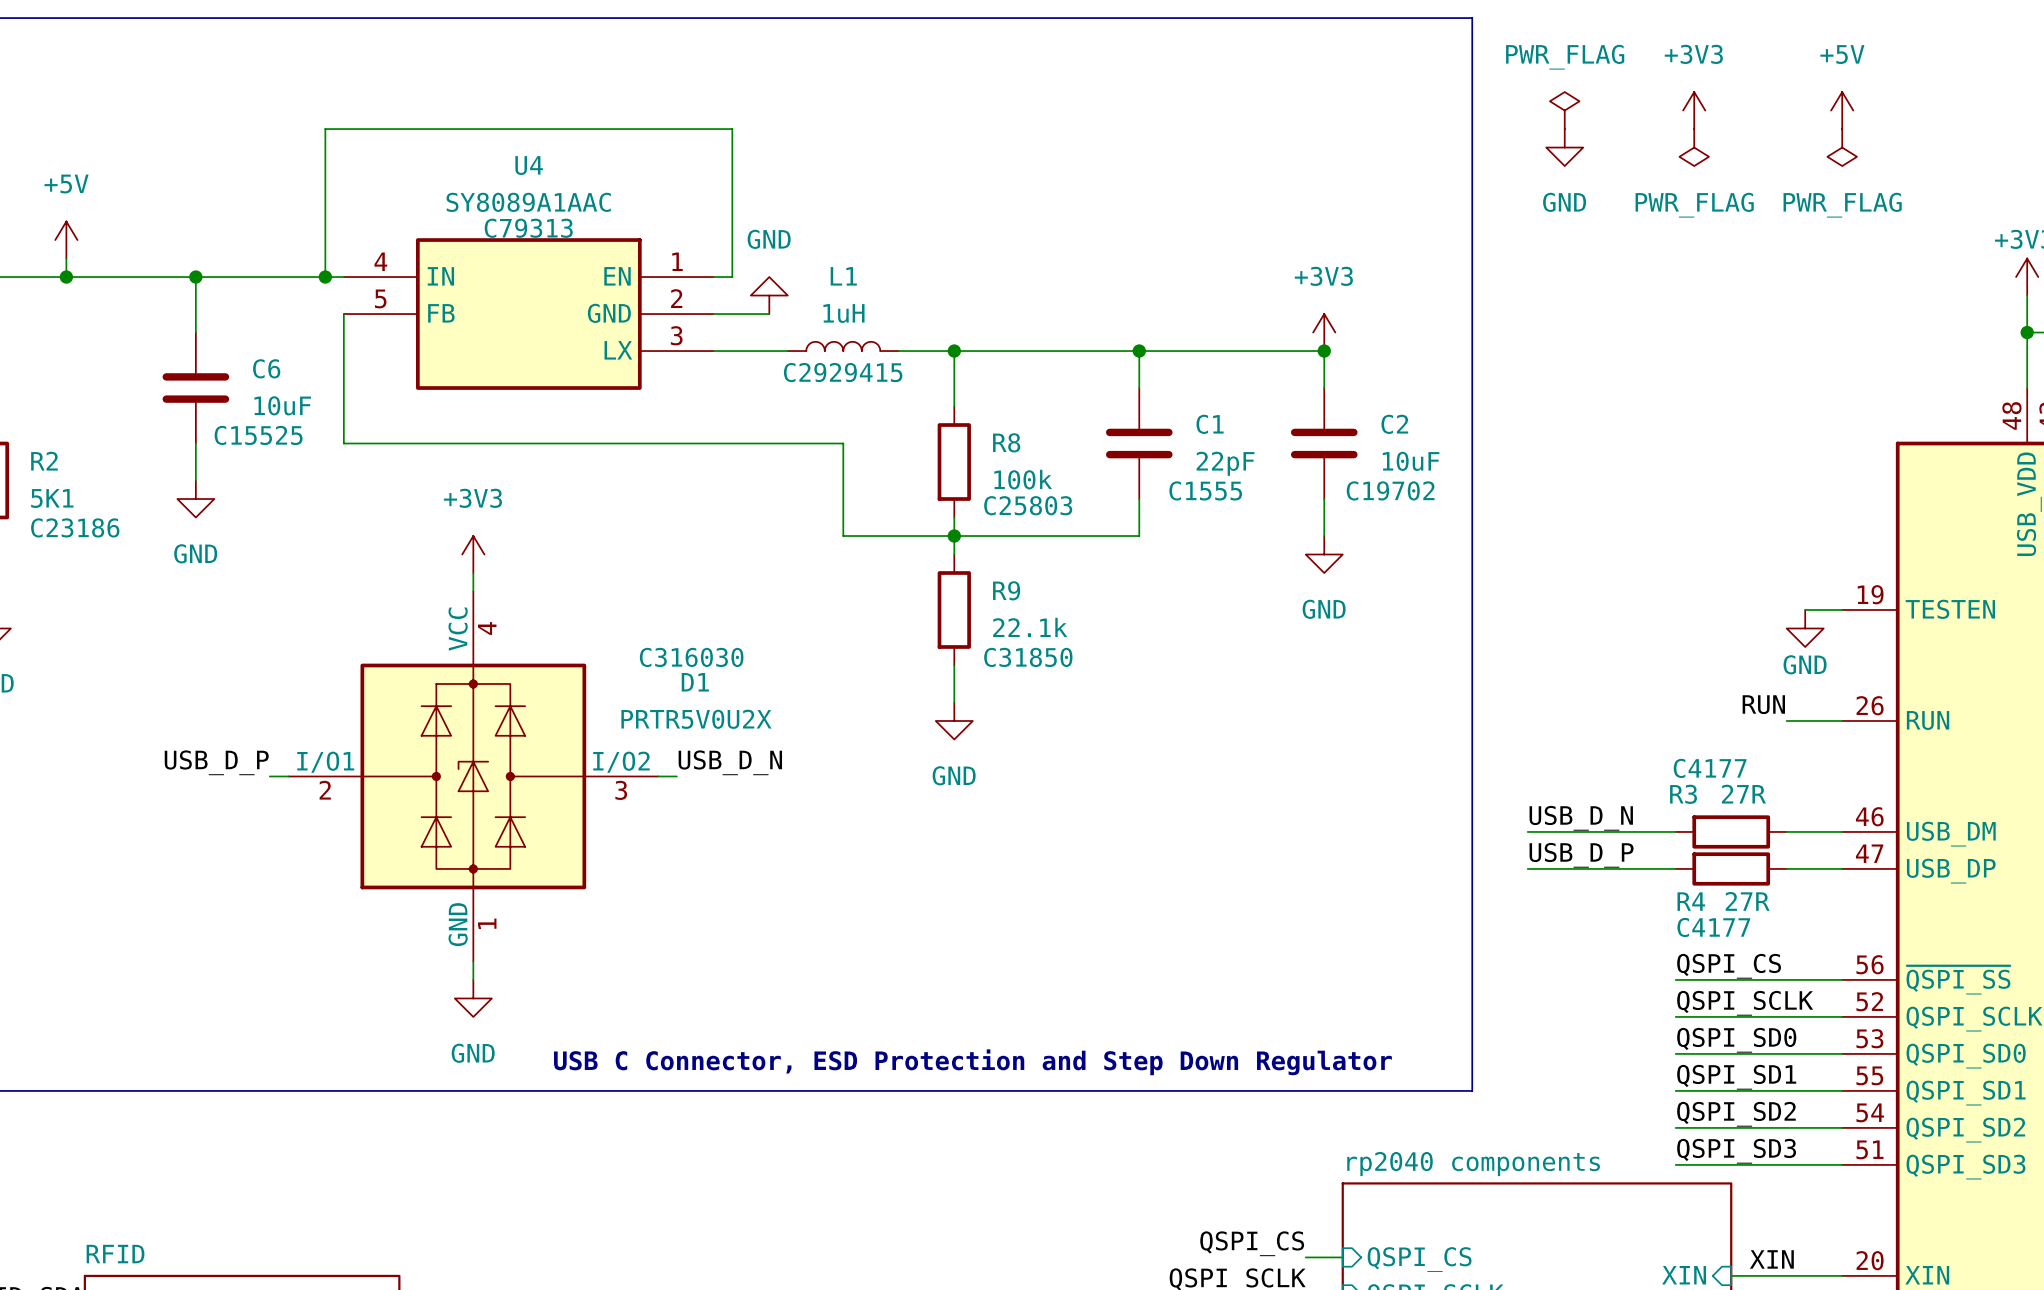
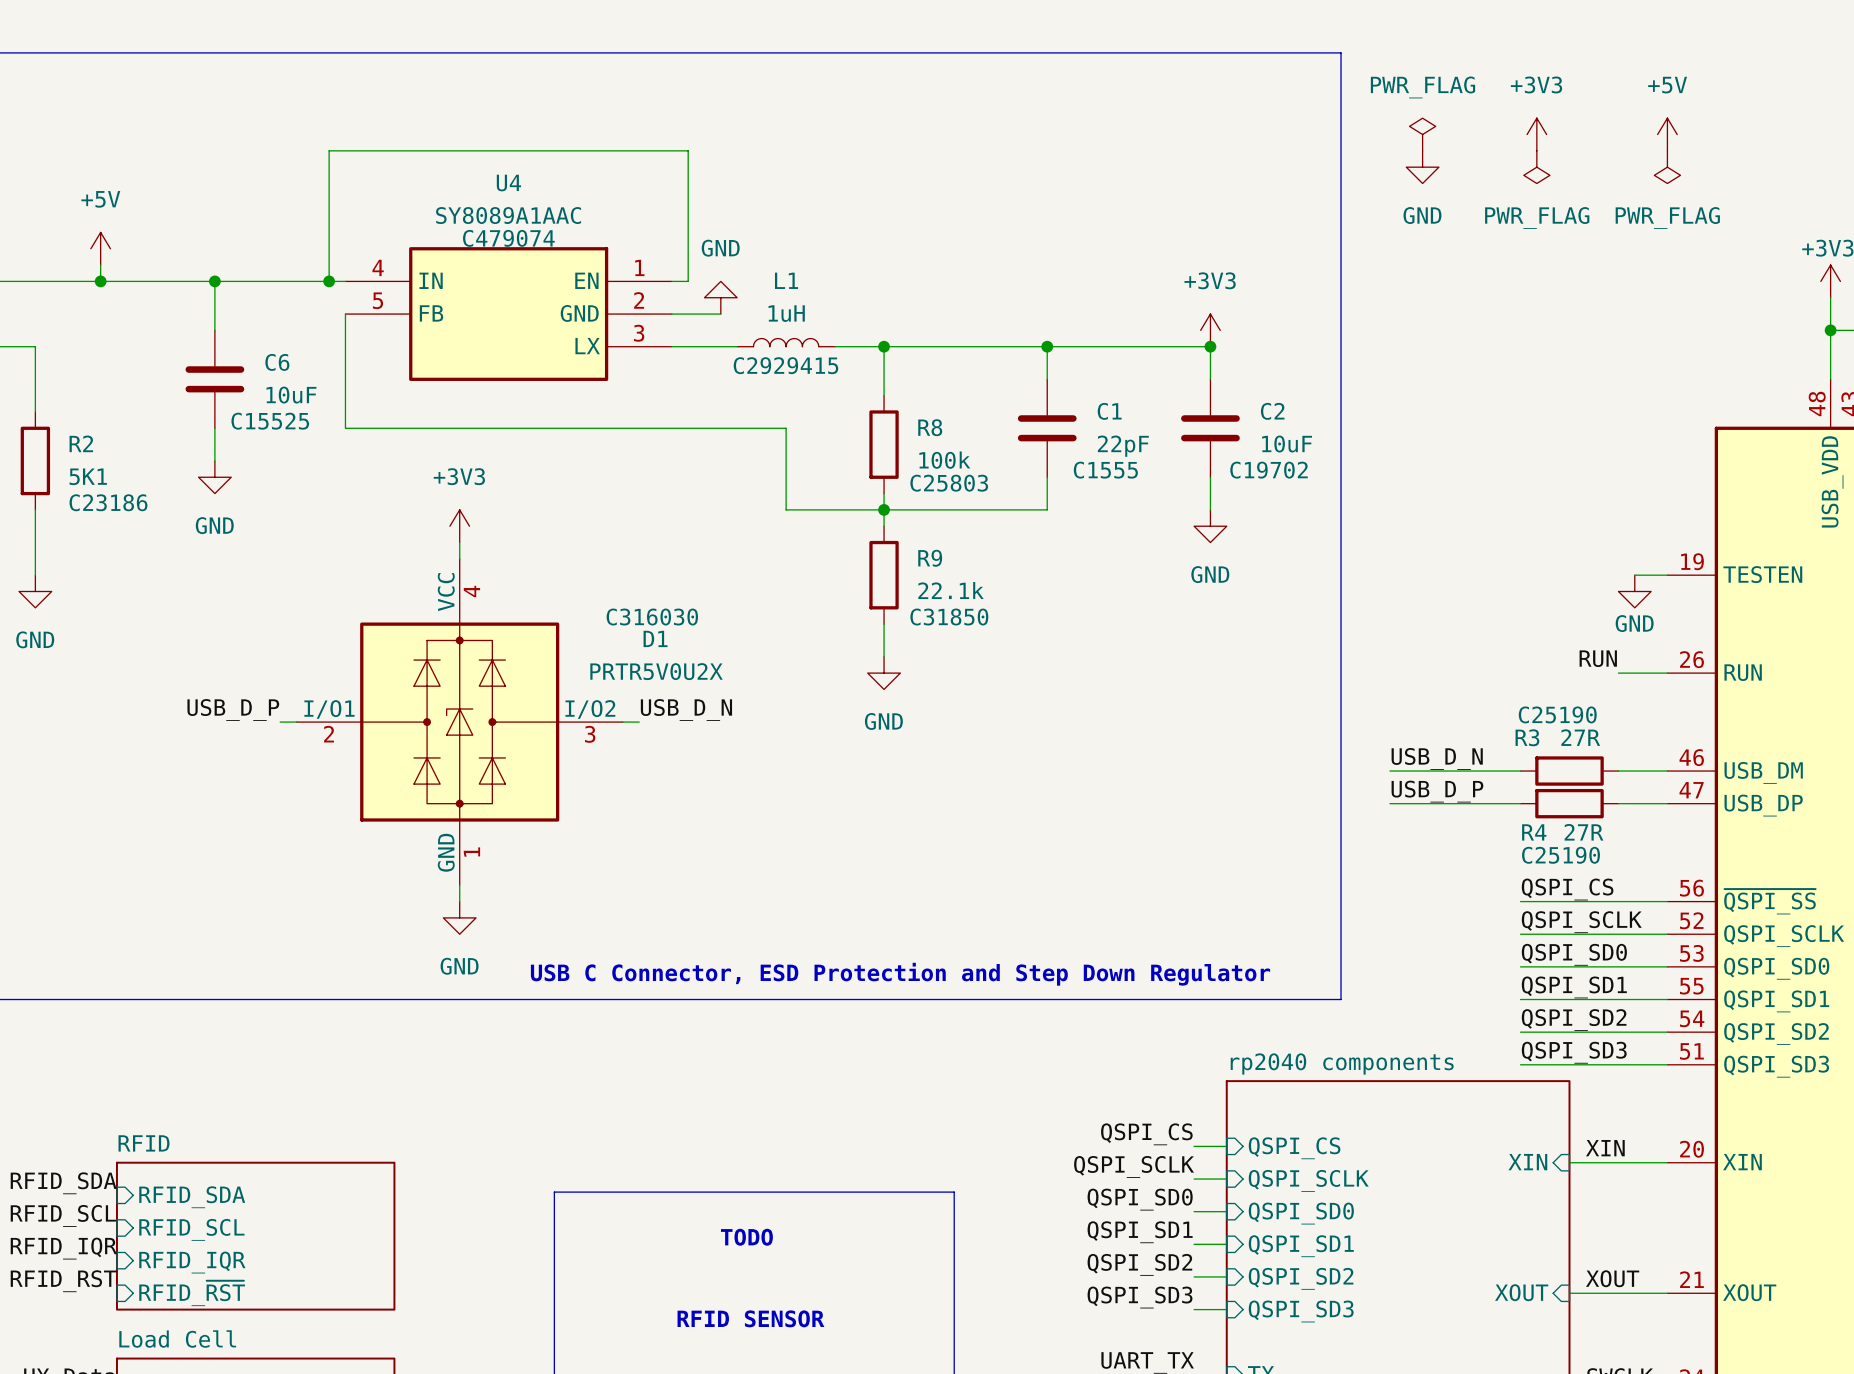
U4 text: C79313 (528, 228) -> C479074 (508, 238)
R3 text: C4177 (1710, 768) -> C25190 (1557, 714)
R4 text: C4177 (1713, 927) -> C25190 (1561, 855)

